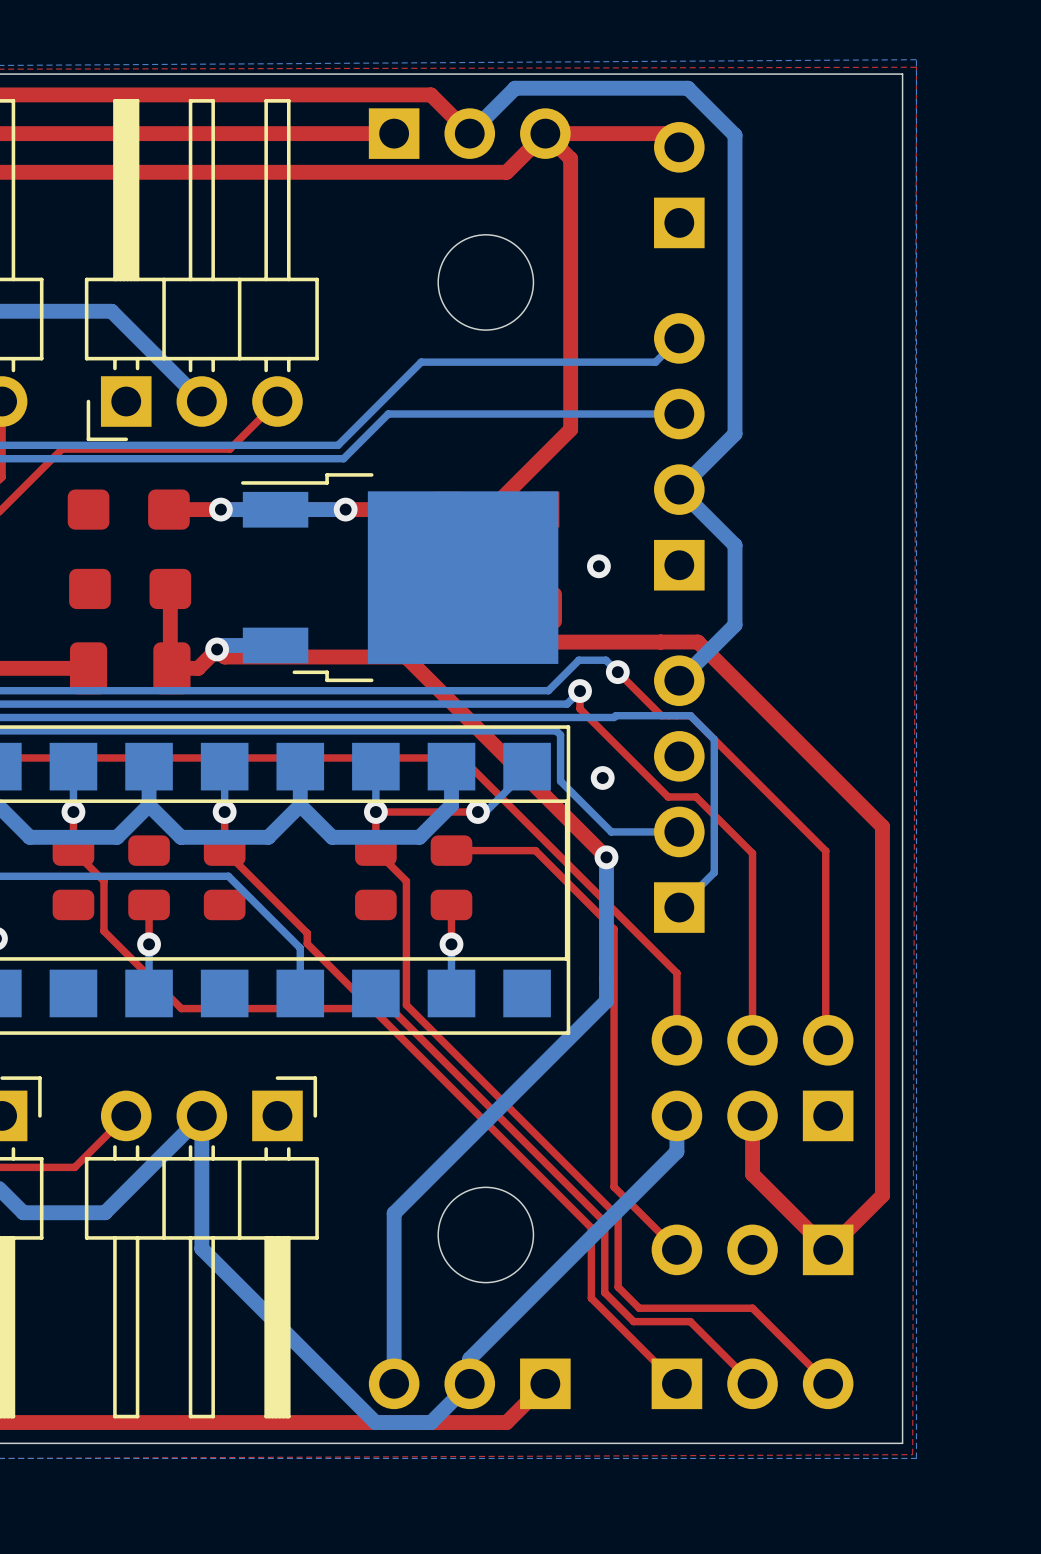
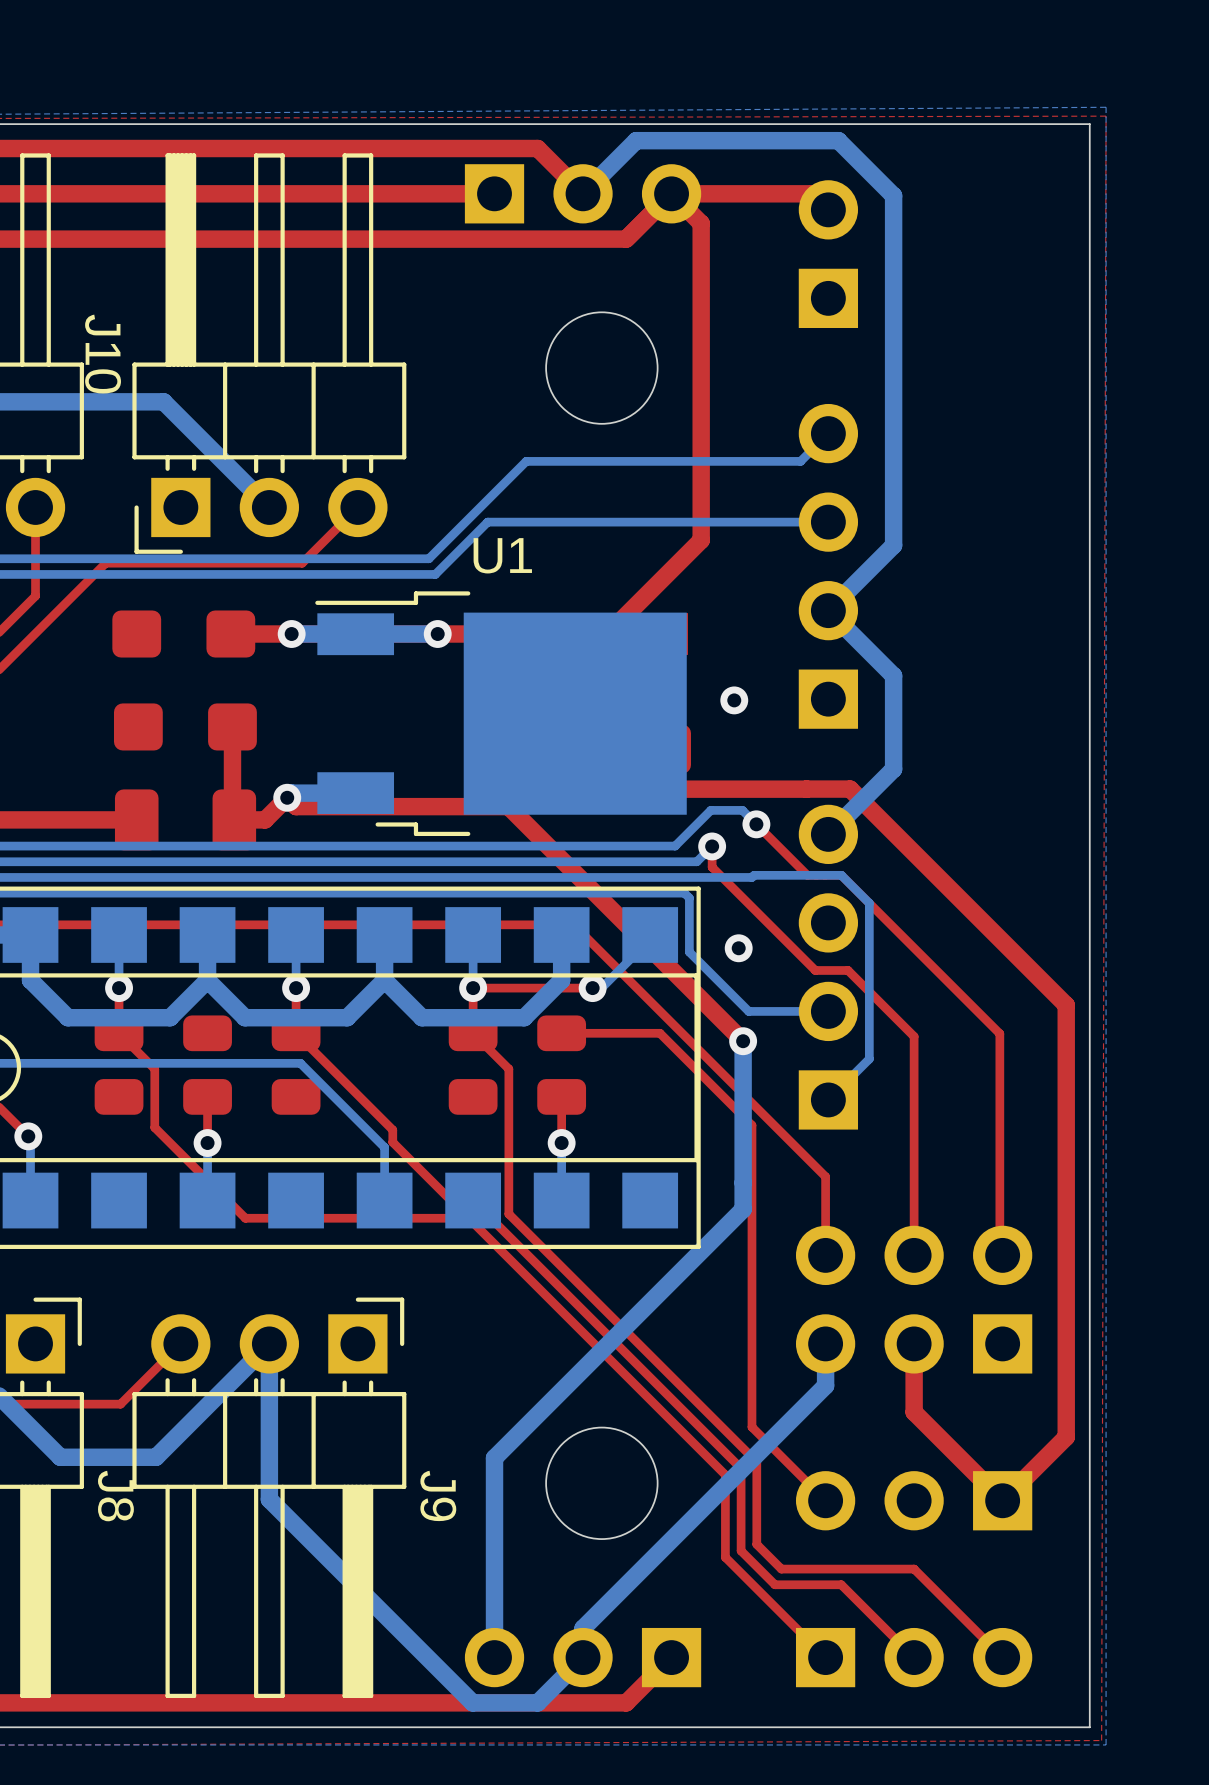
J10 name: none -> J10 (103, 354)
U1 name: none -> U1 (502, 555)
J8 name: none -> J8 (115, 1496)
J9 name: none -> J9 (438, 1495)

